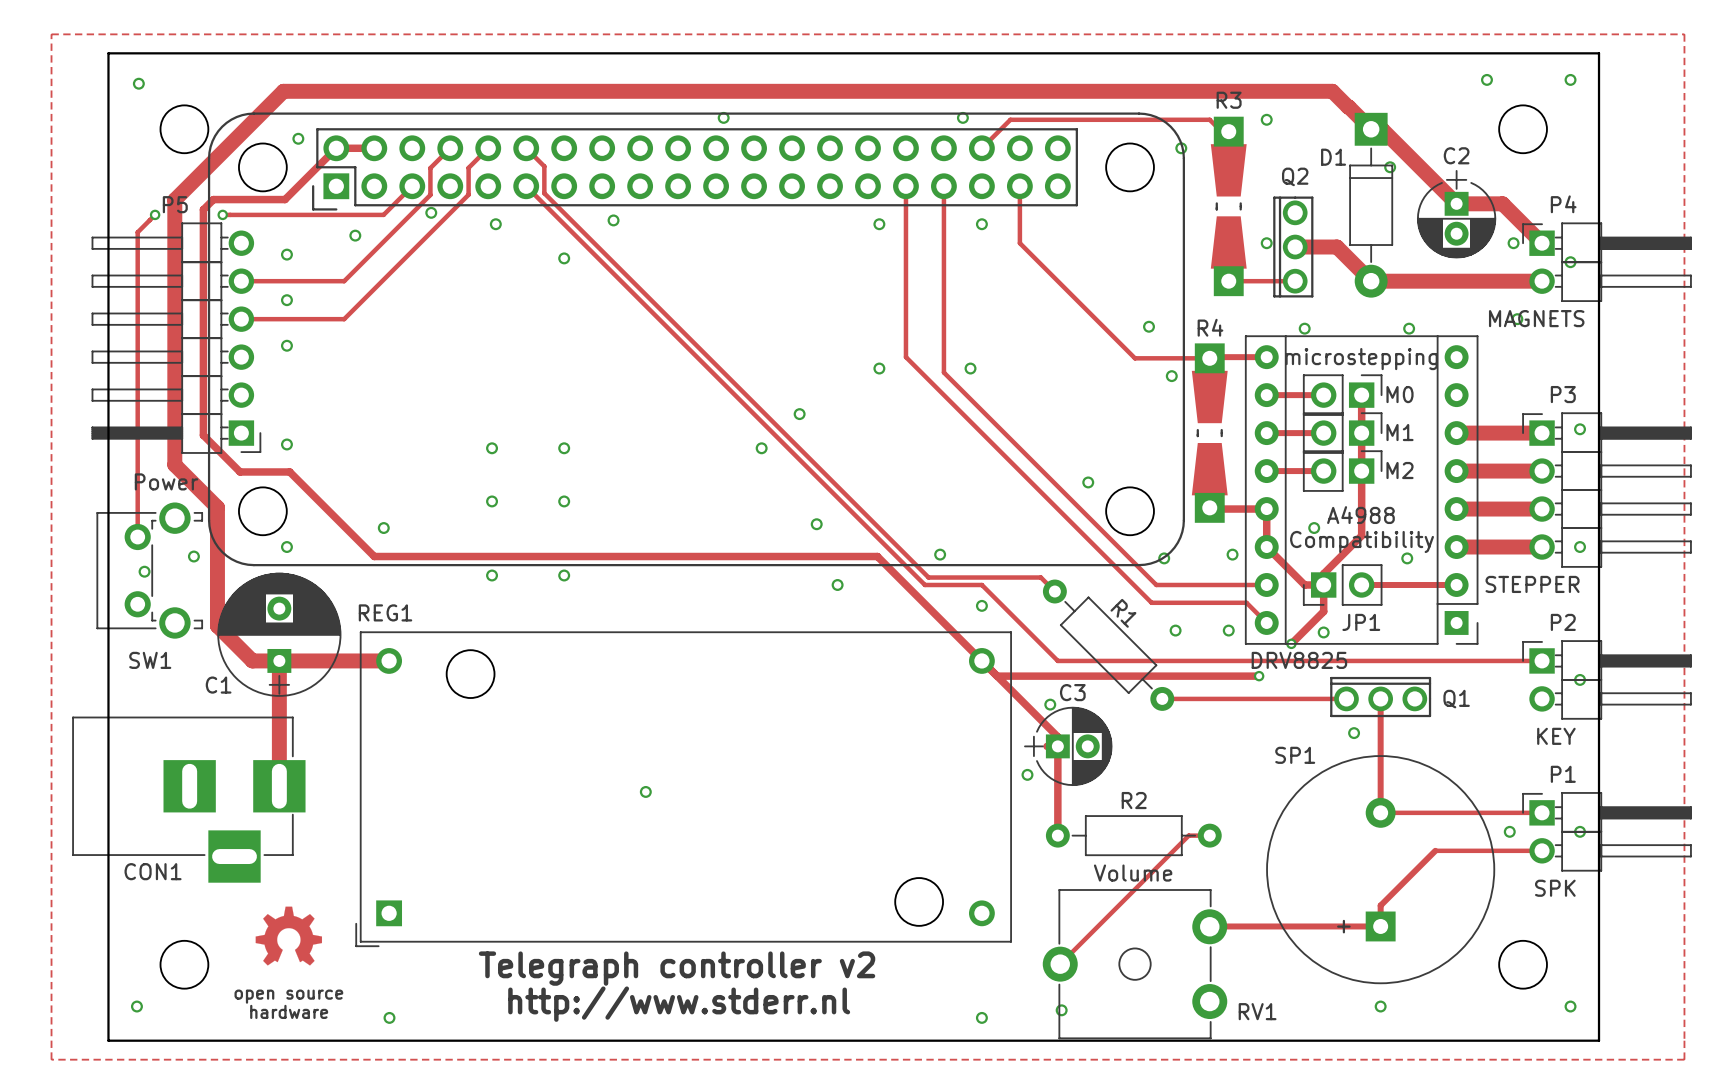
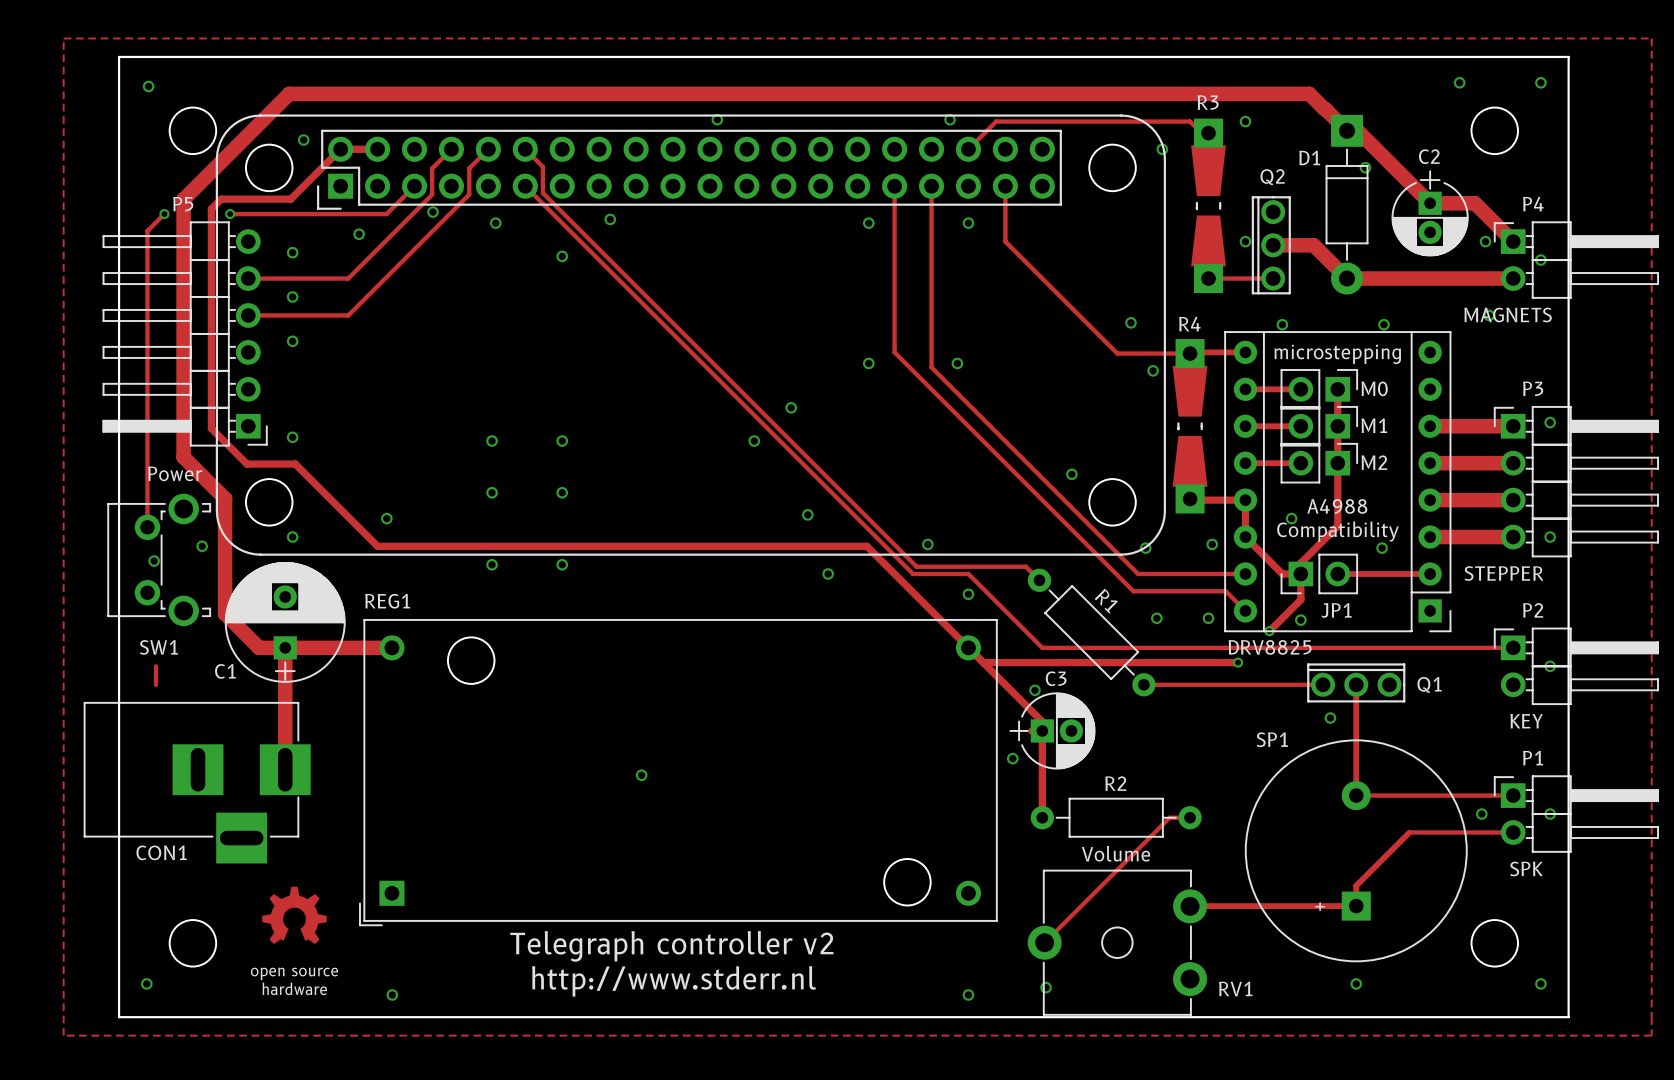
track: none -> (155, 666) (155, 684)

